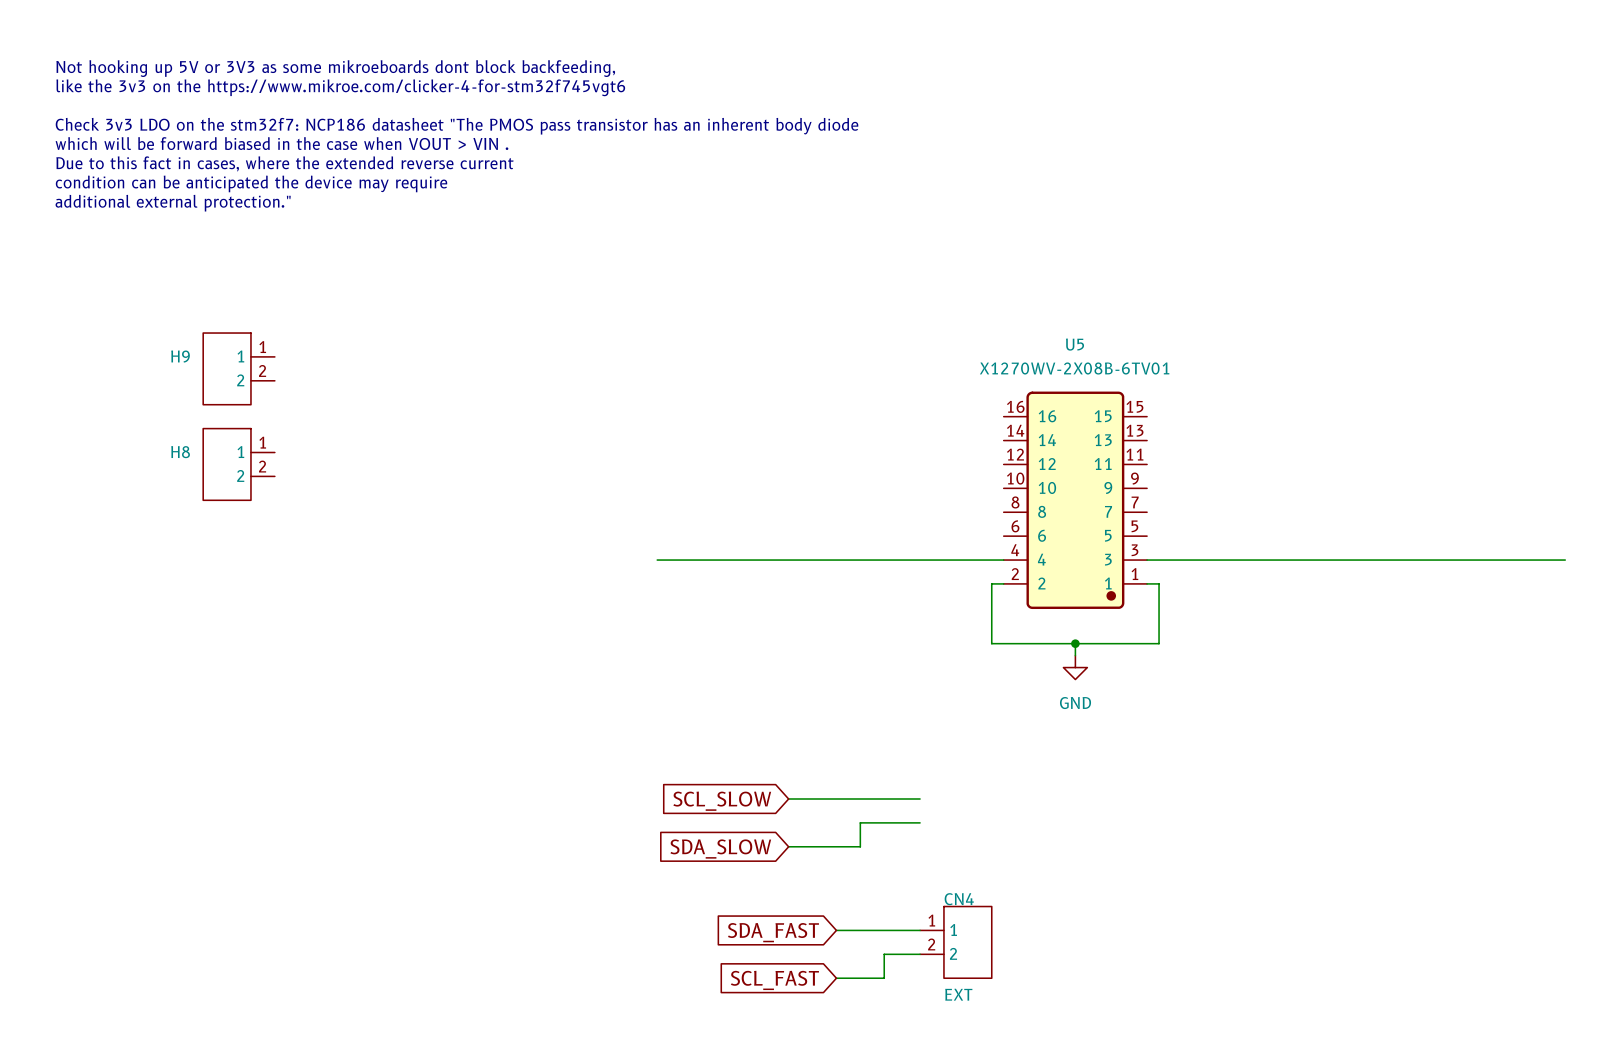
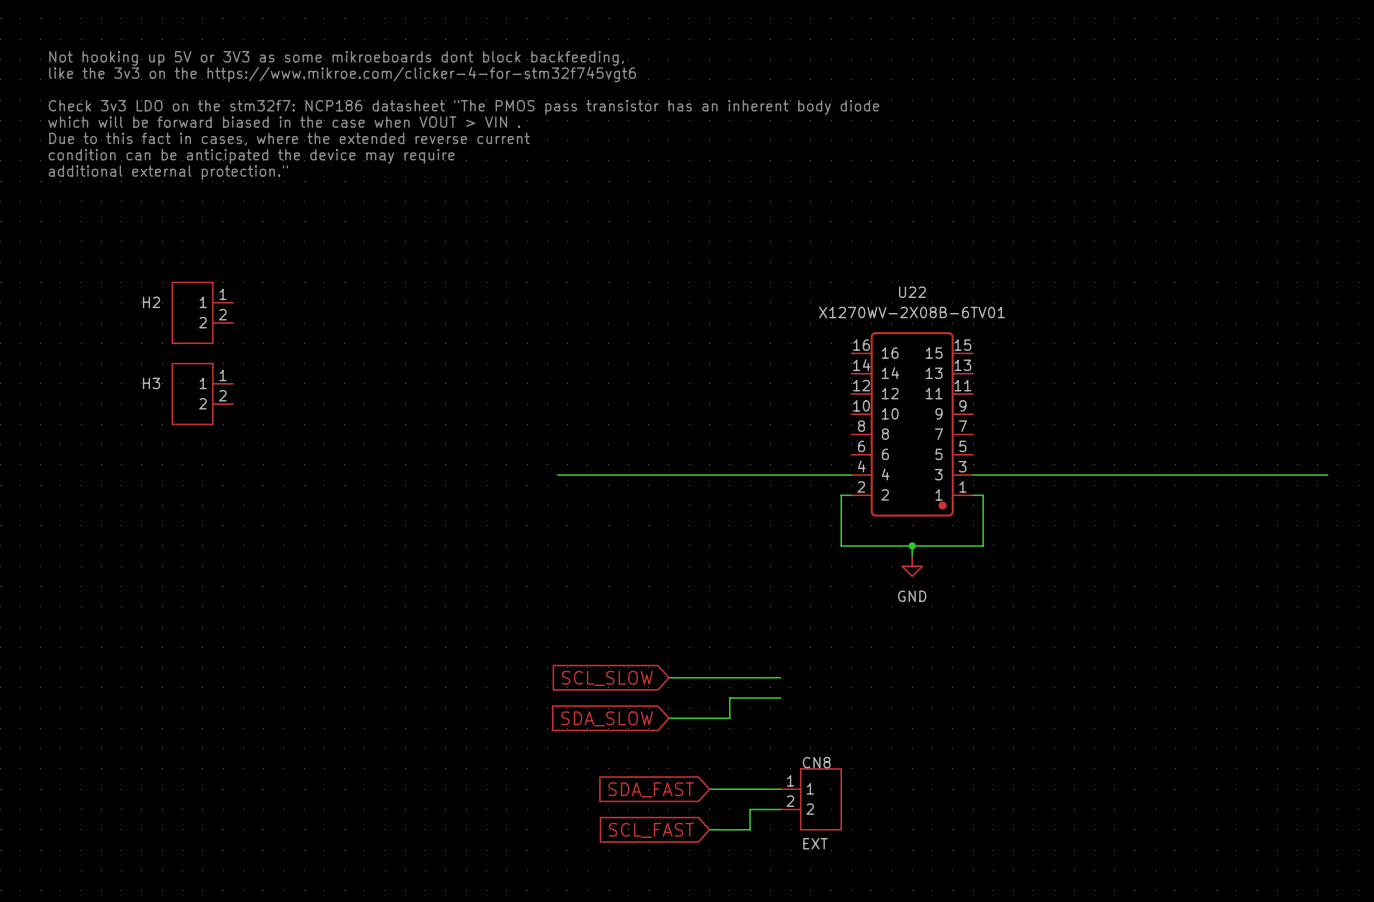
U5 name: U5 (1074, 344) -> U22 (912, 292)
H9 name: H9 (180, 356) -> H2 (151, 302)
H8 name: H8 (180, 452) -> H3 (151, 383)
CN4 name: CN4 (959, 899) -> CN8 (816, 762)

